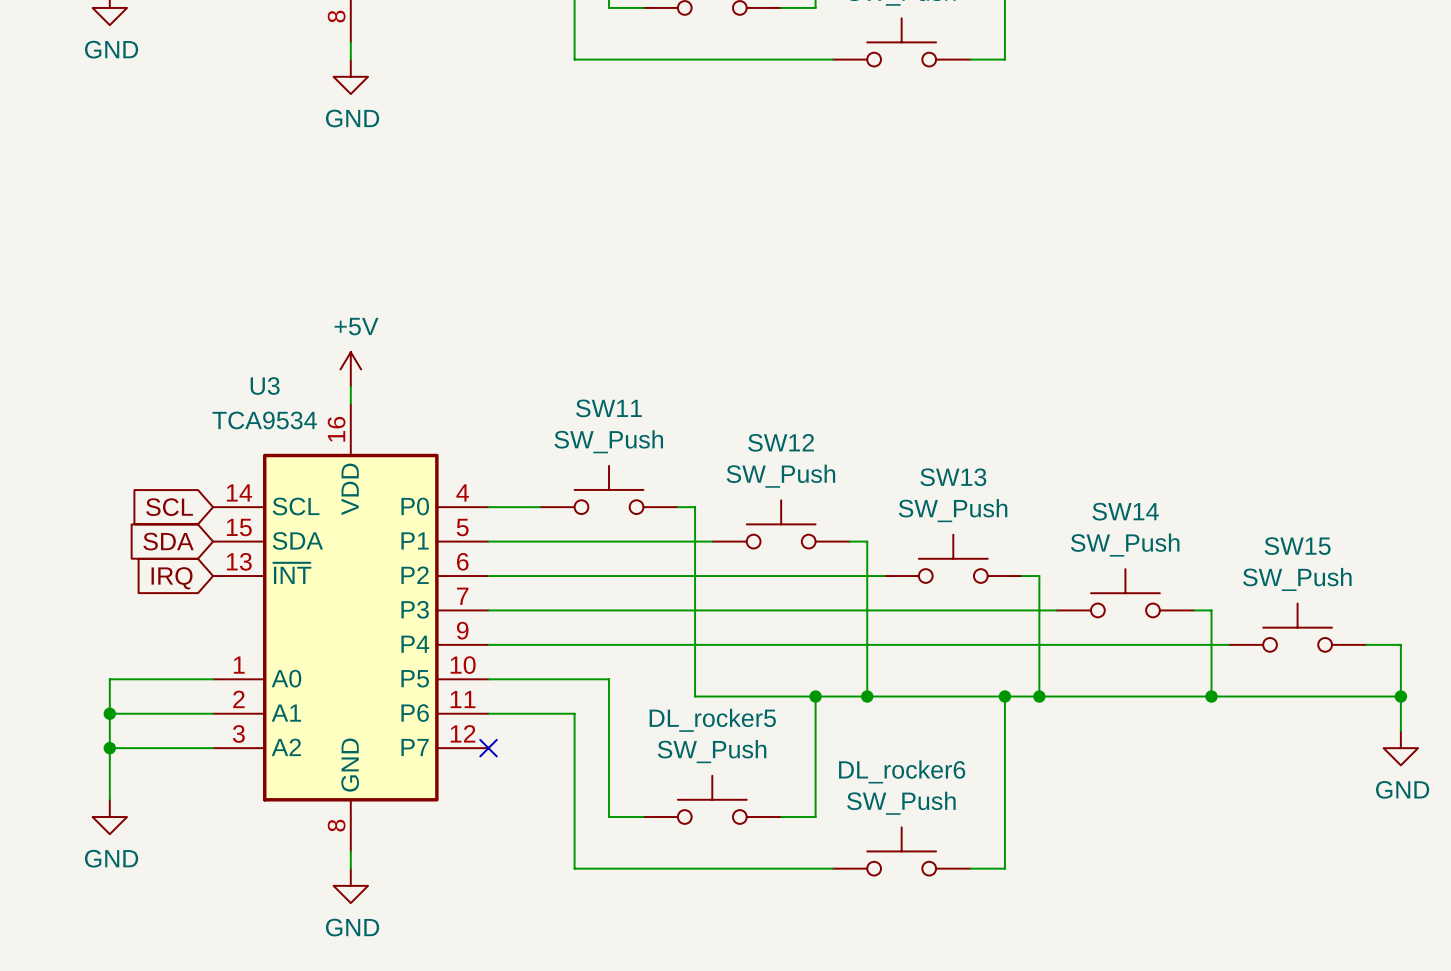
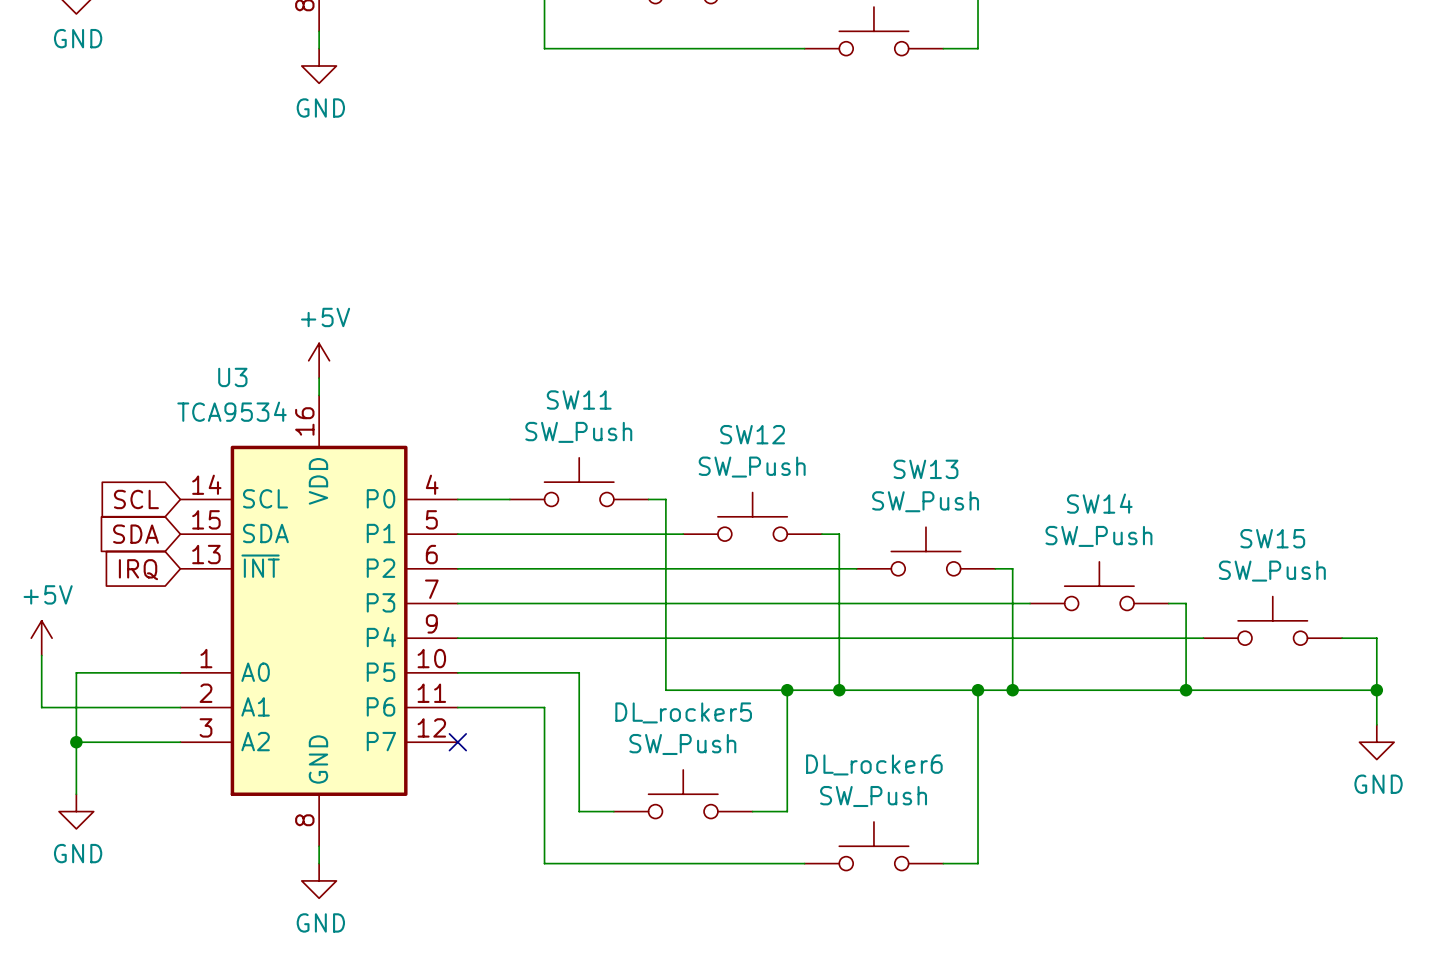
power symbol: none -> +5V (41, 638)
wire: none -> (41, 655) (41, 707) (76, 707)
junction: (109, 713) -> none

